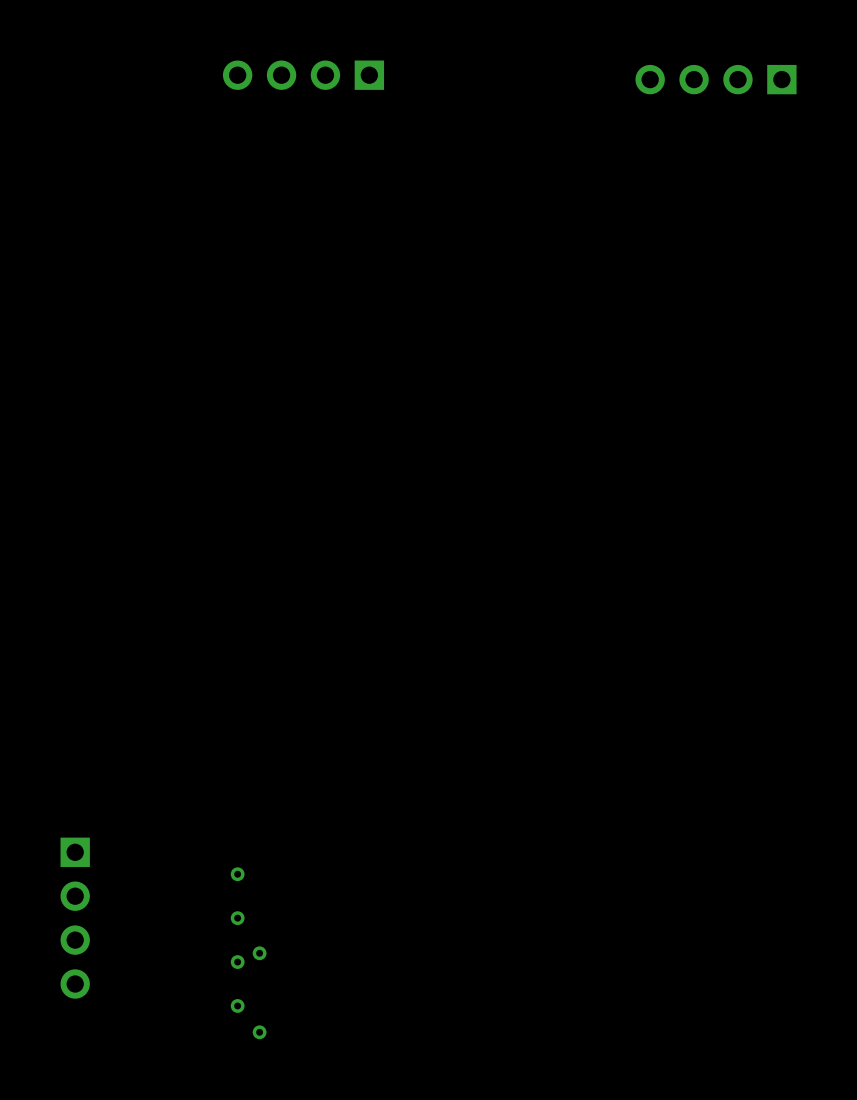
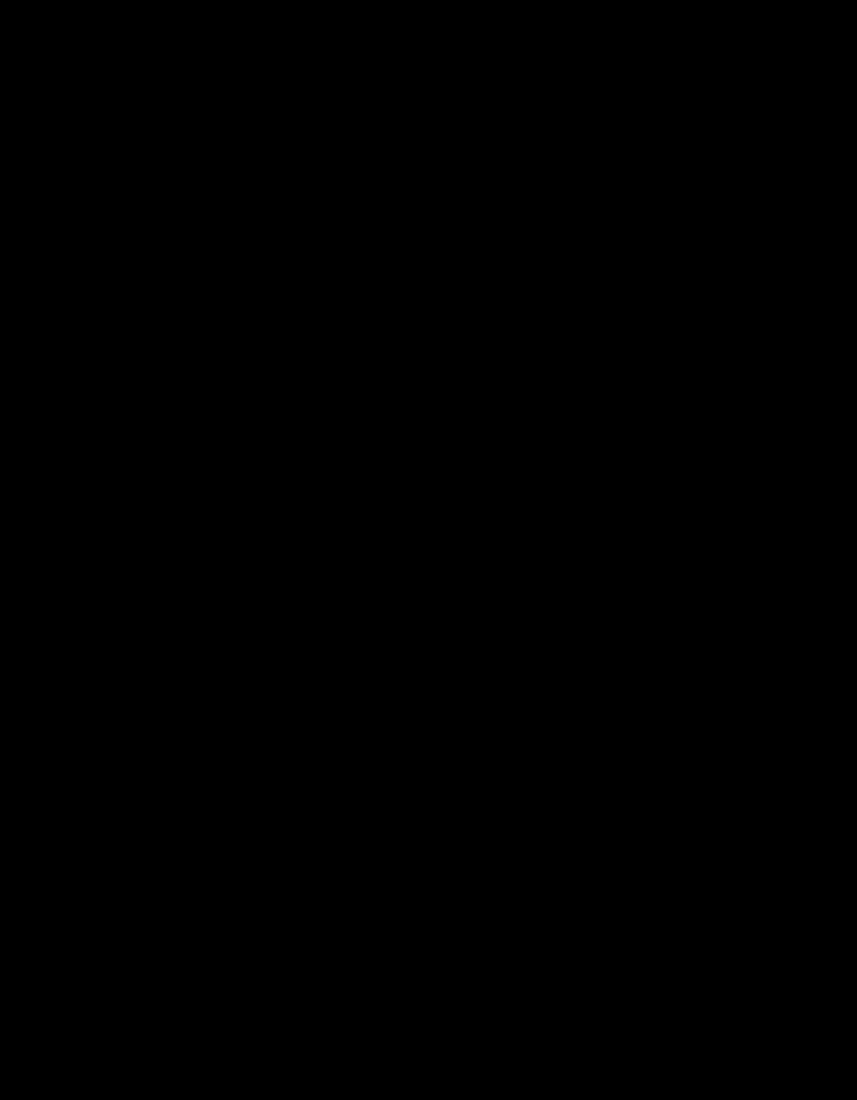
part: (303, 75) -> none
part: (716, 79) -> none
via: (237, 874) -> none
part: (75, 918) -> none
via: (237, 918) -> none
via: (259, 953) -> none
via: (237, 962) -> none
via: (237, 1005) -> none
via: (259, 1032) -> none

